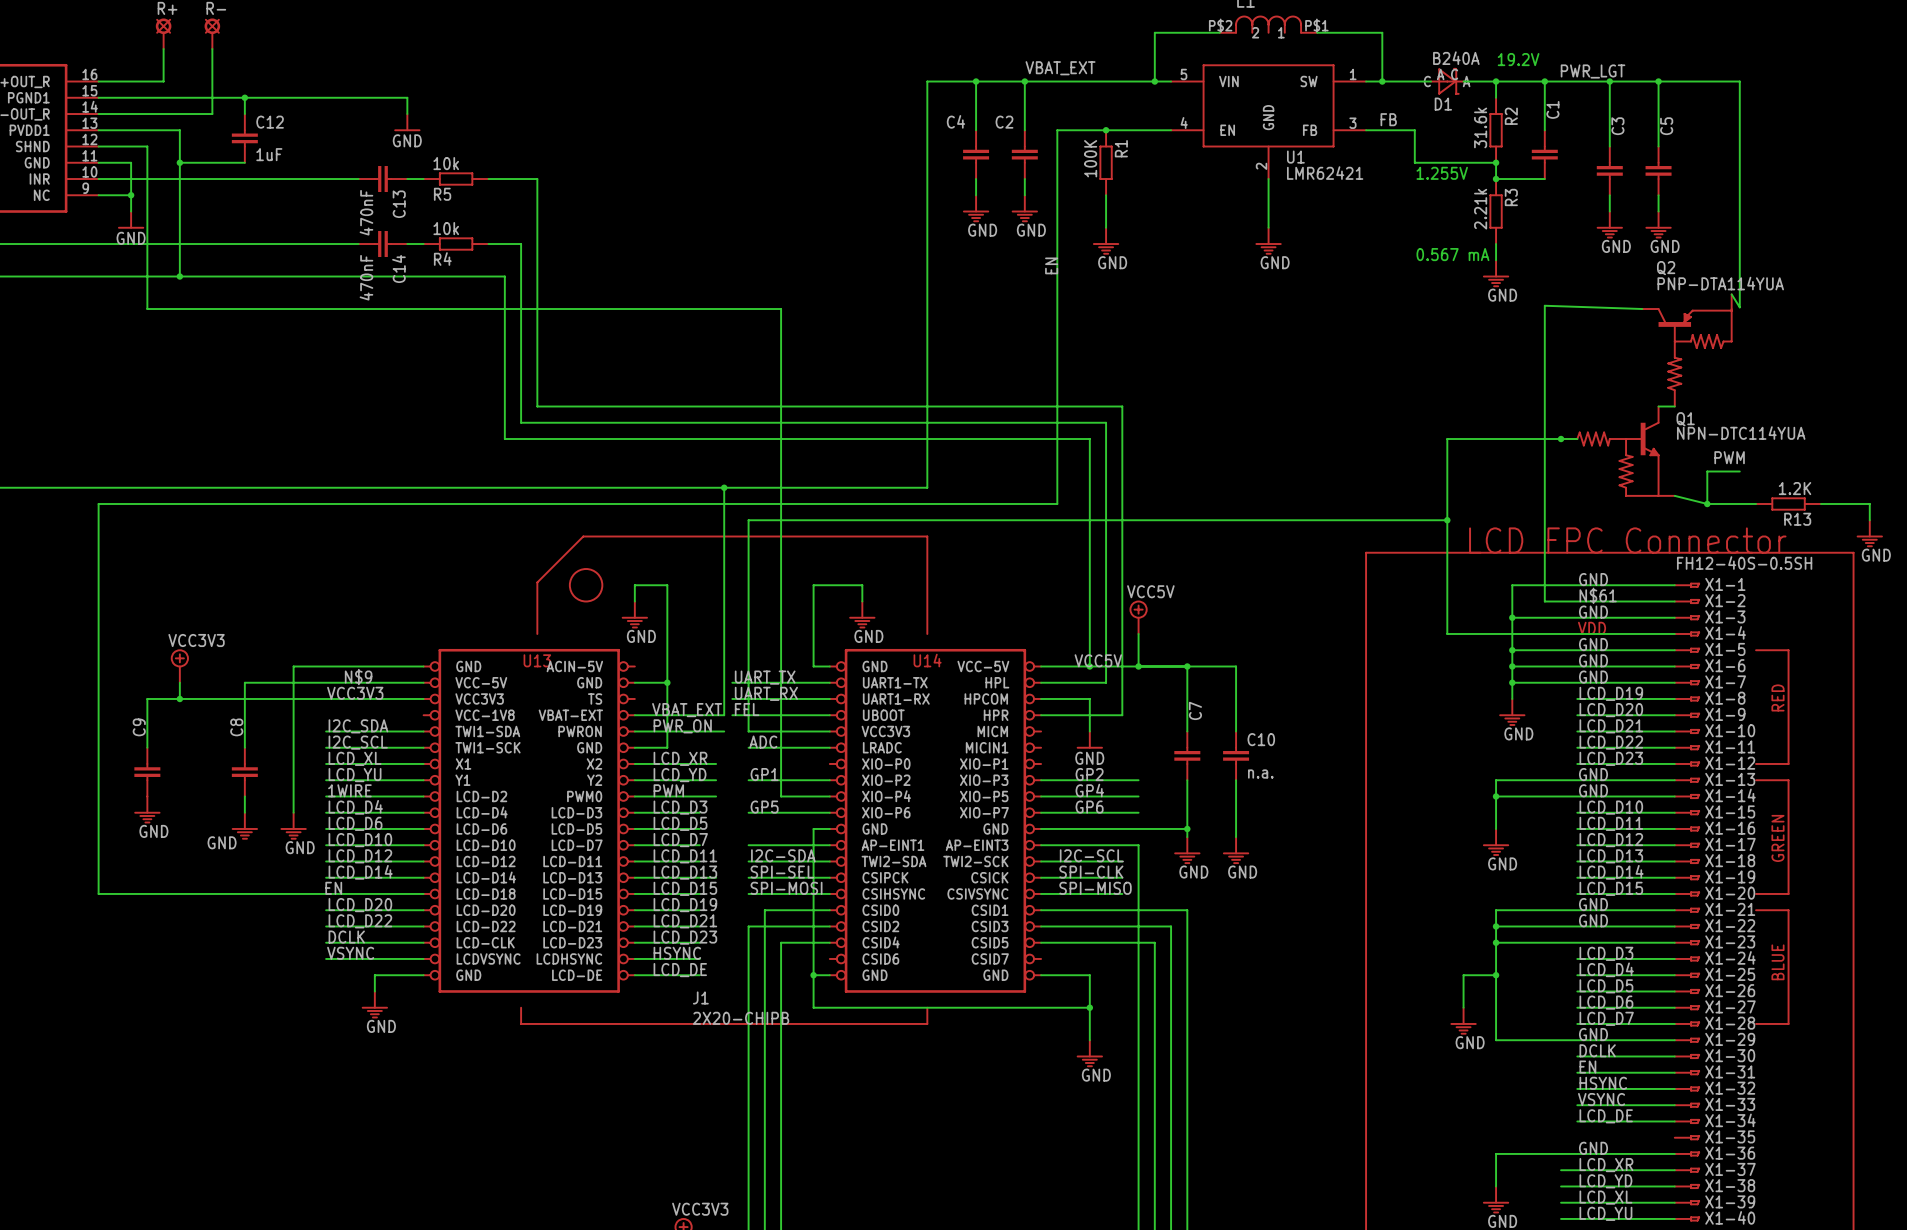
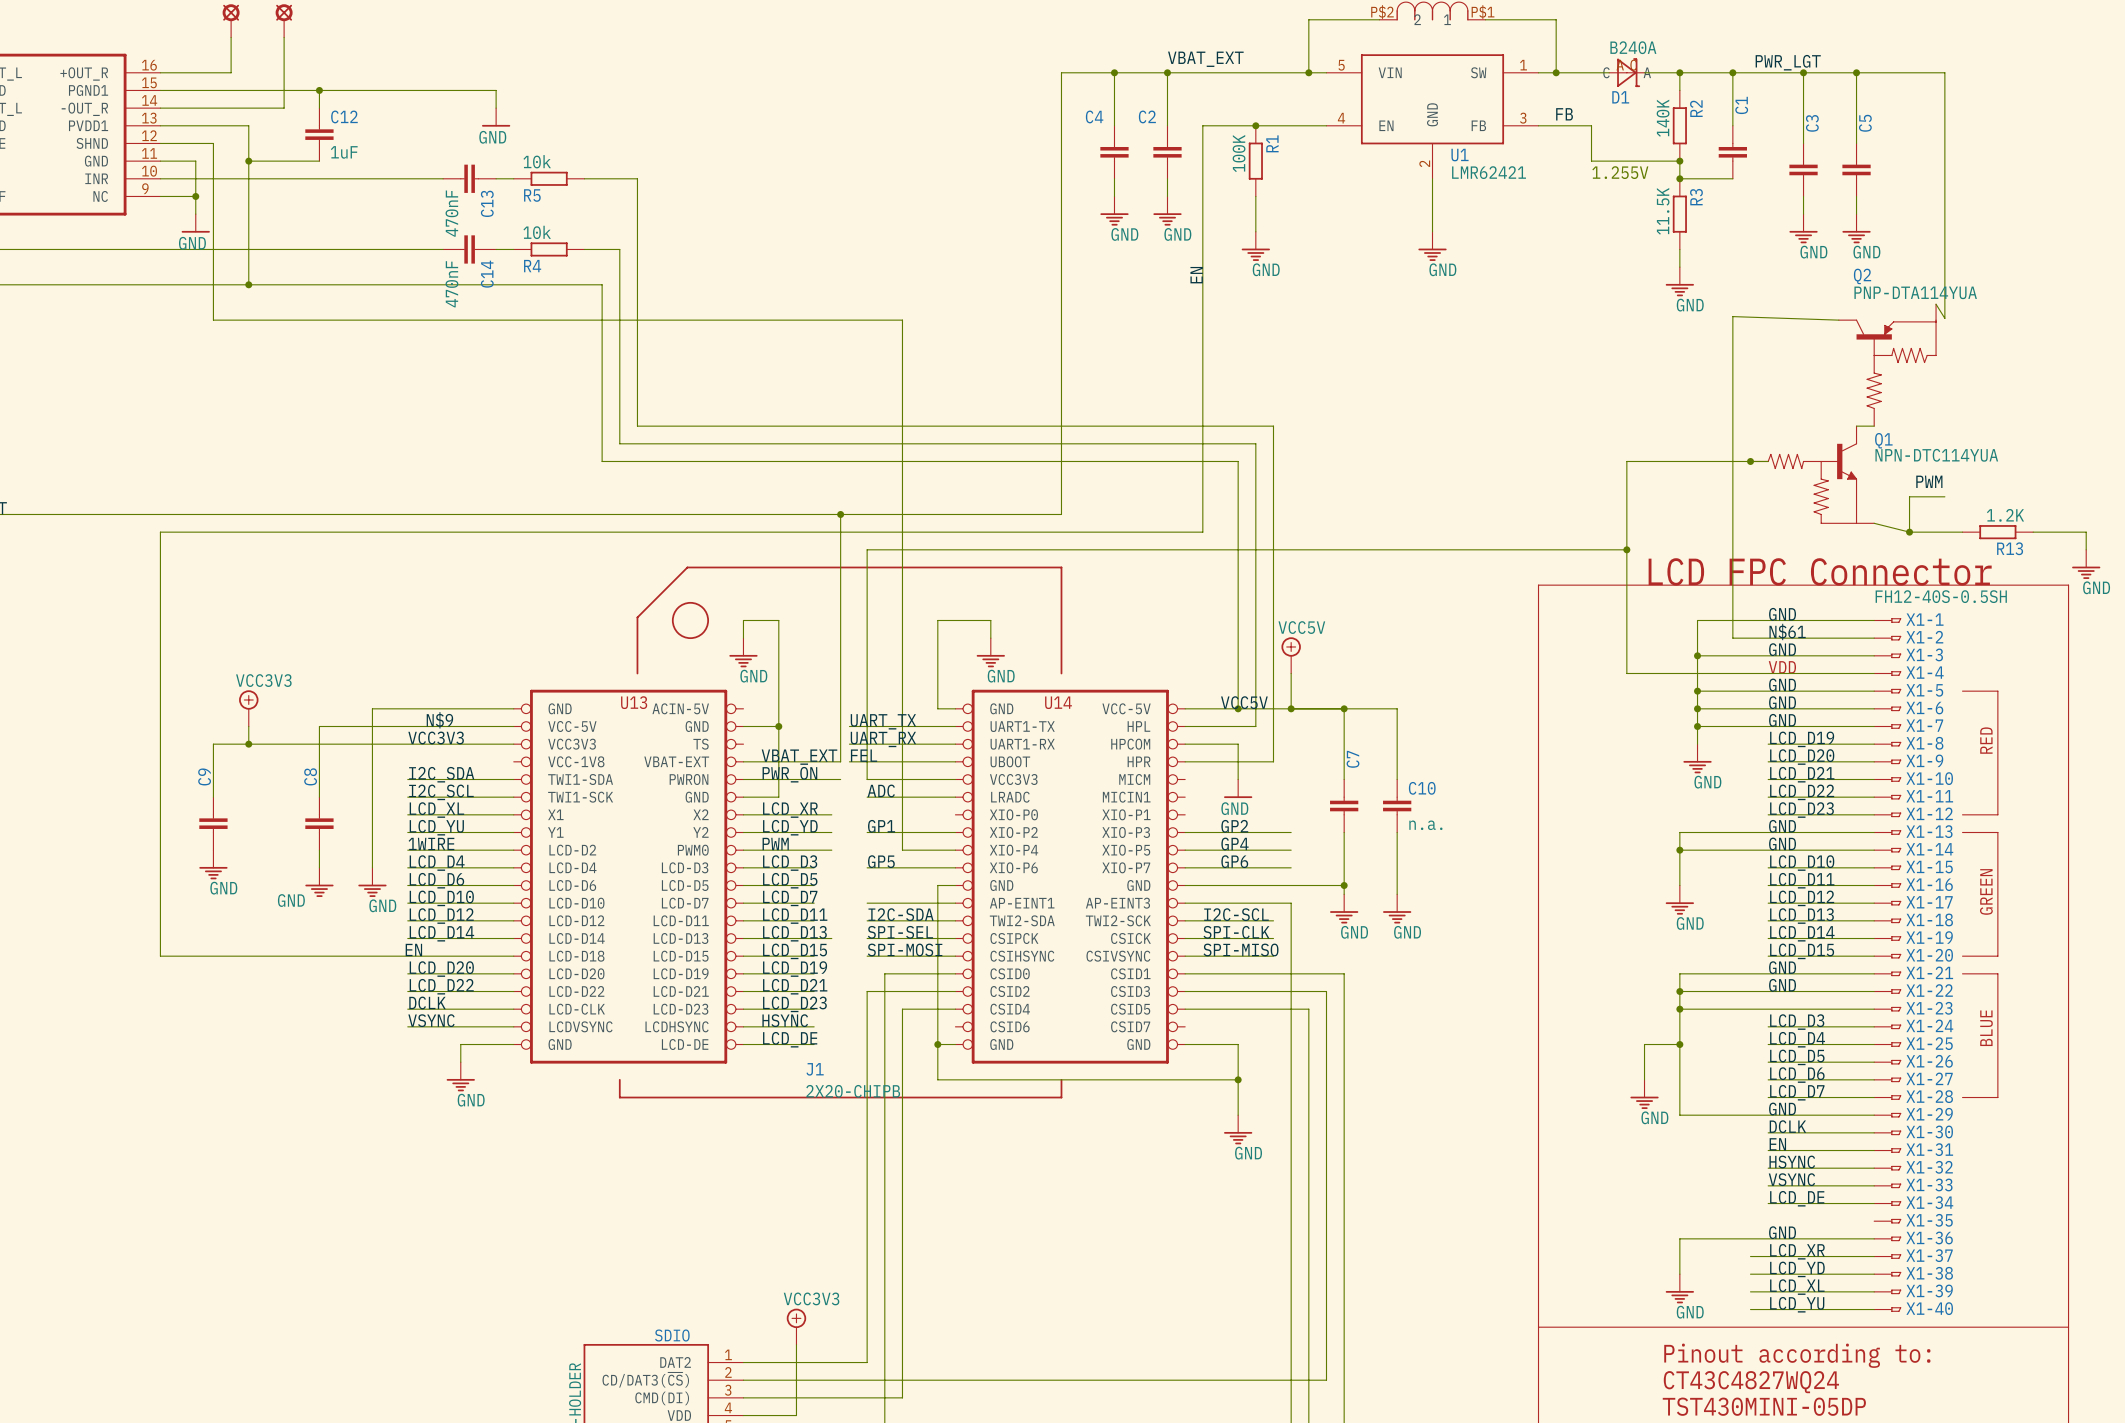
text: 19.2V (1518, 59) -> none
R2 value: 31.6k (1480, 127) -> 140K (1663, 118)
R3 value: 2.21k (1480, 209) -> 11.5K (1663, 211)
text: 0.567 mA (1452, 254) -> none

